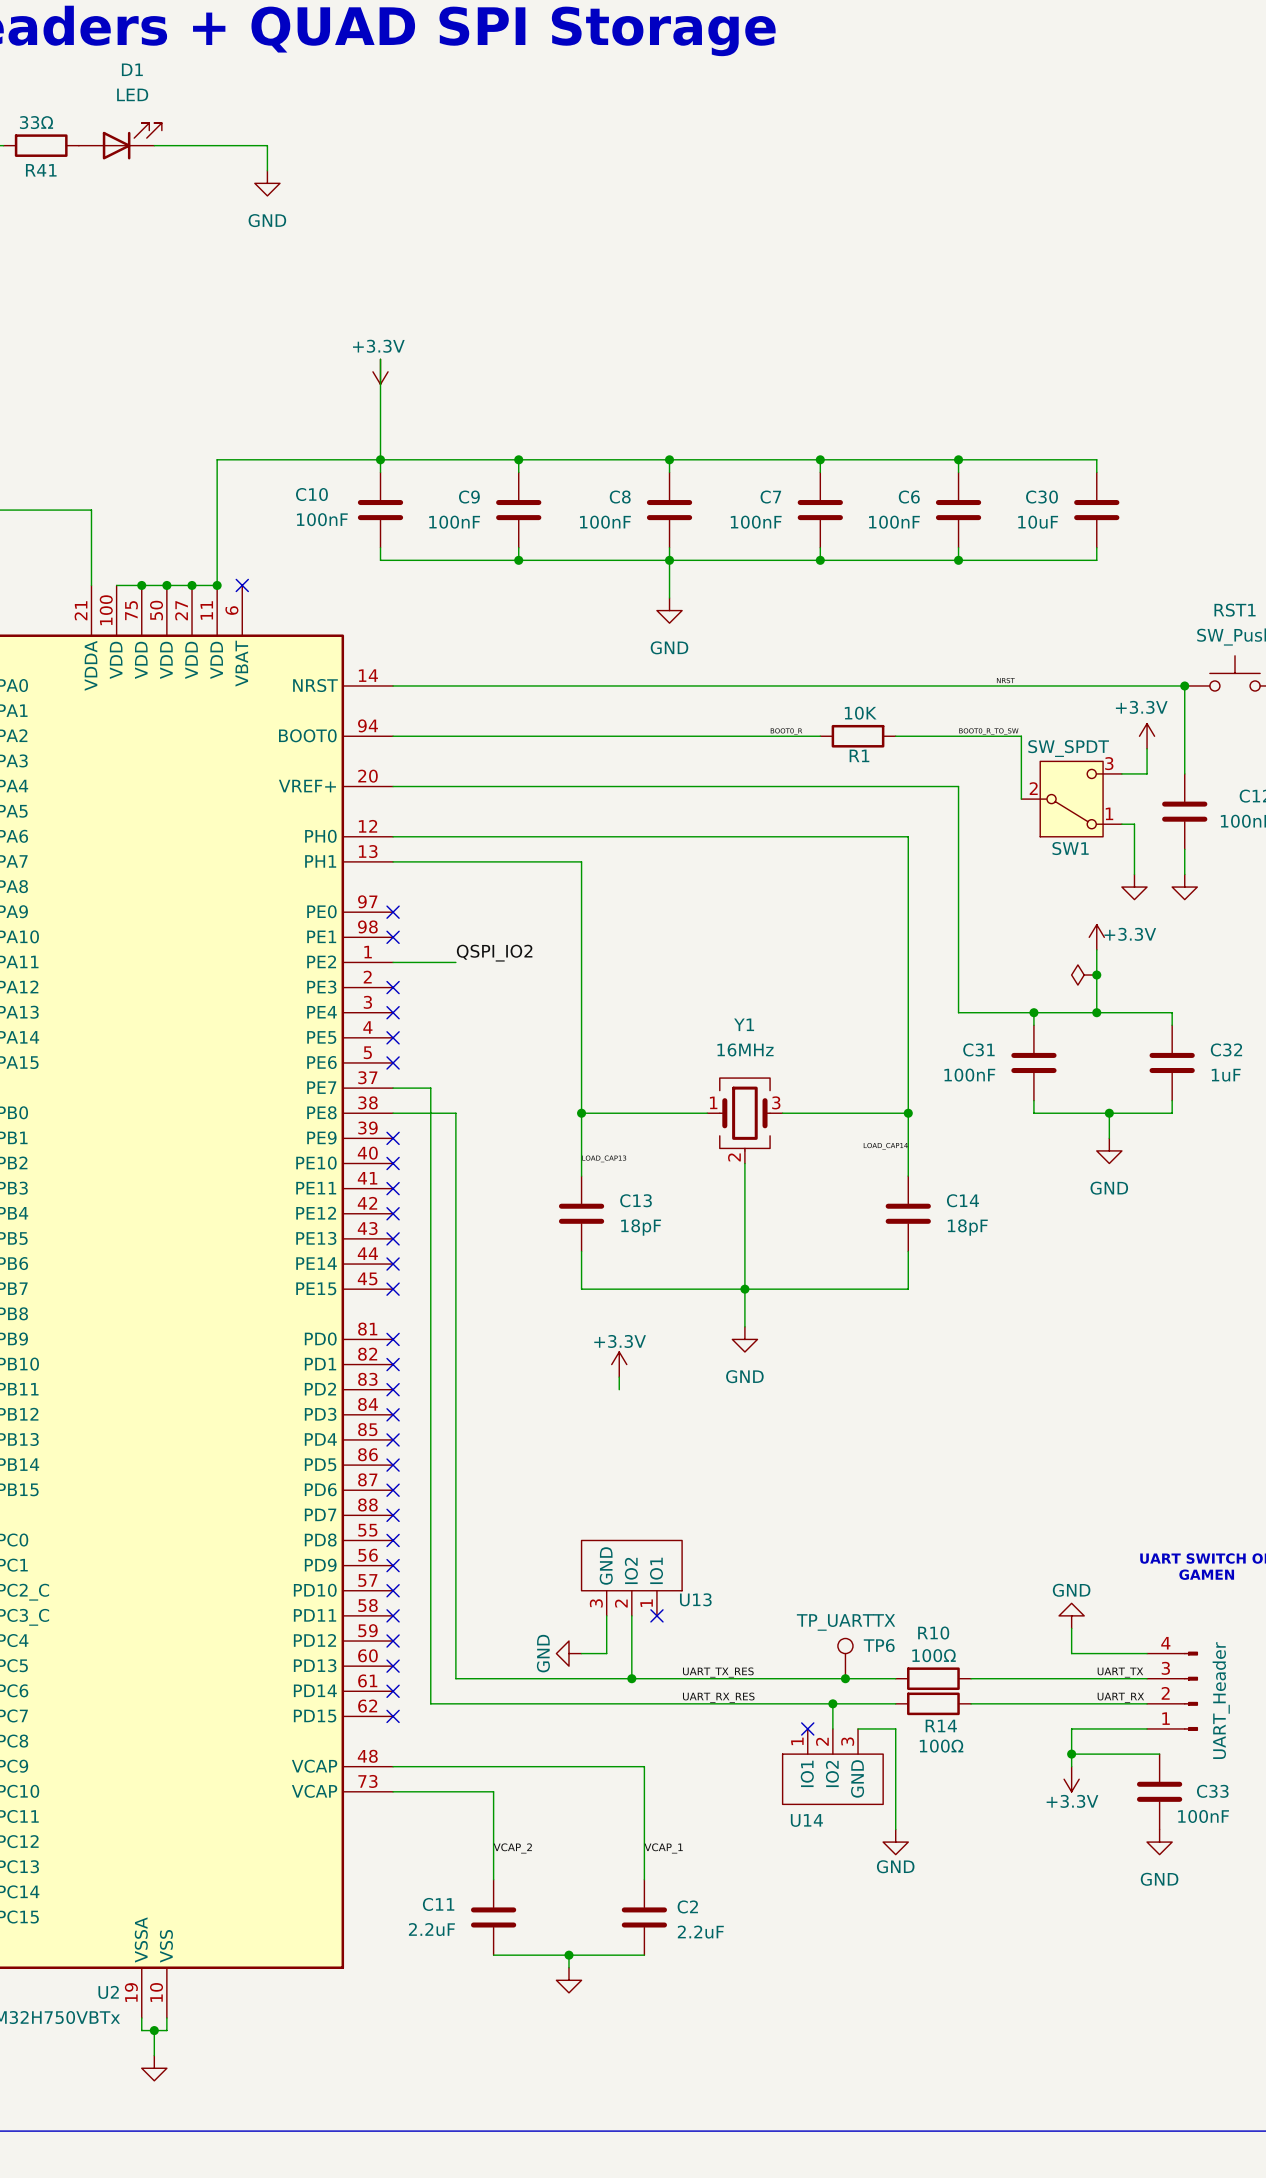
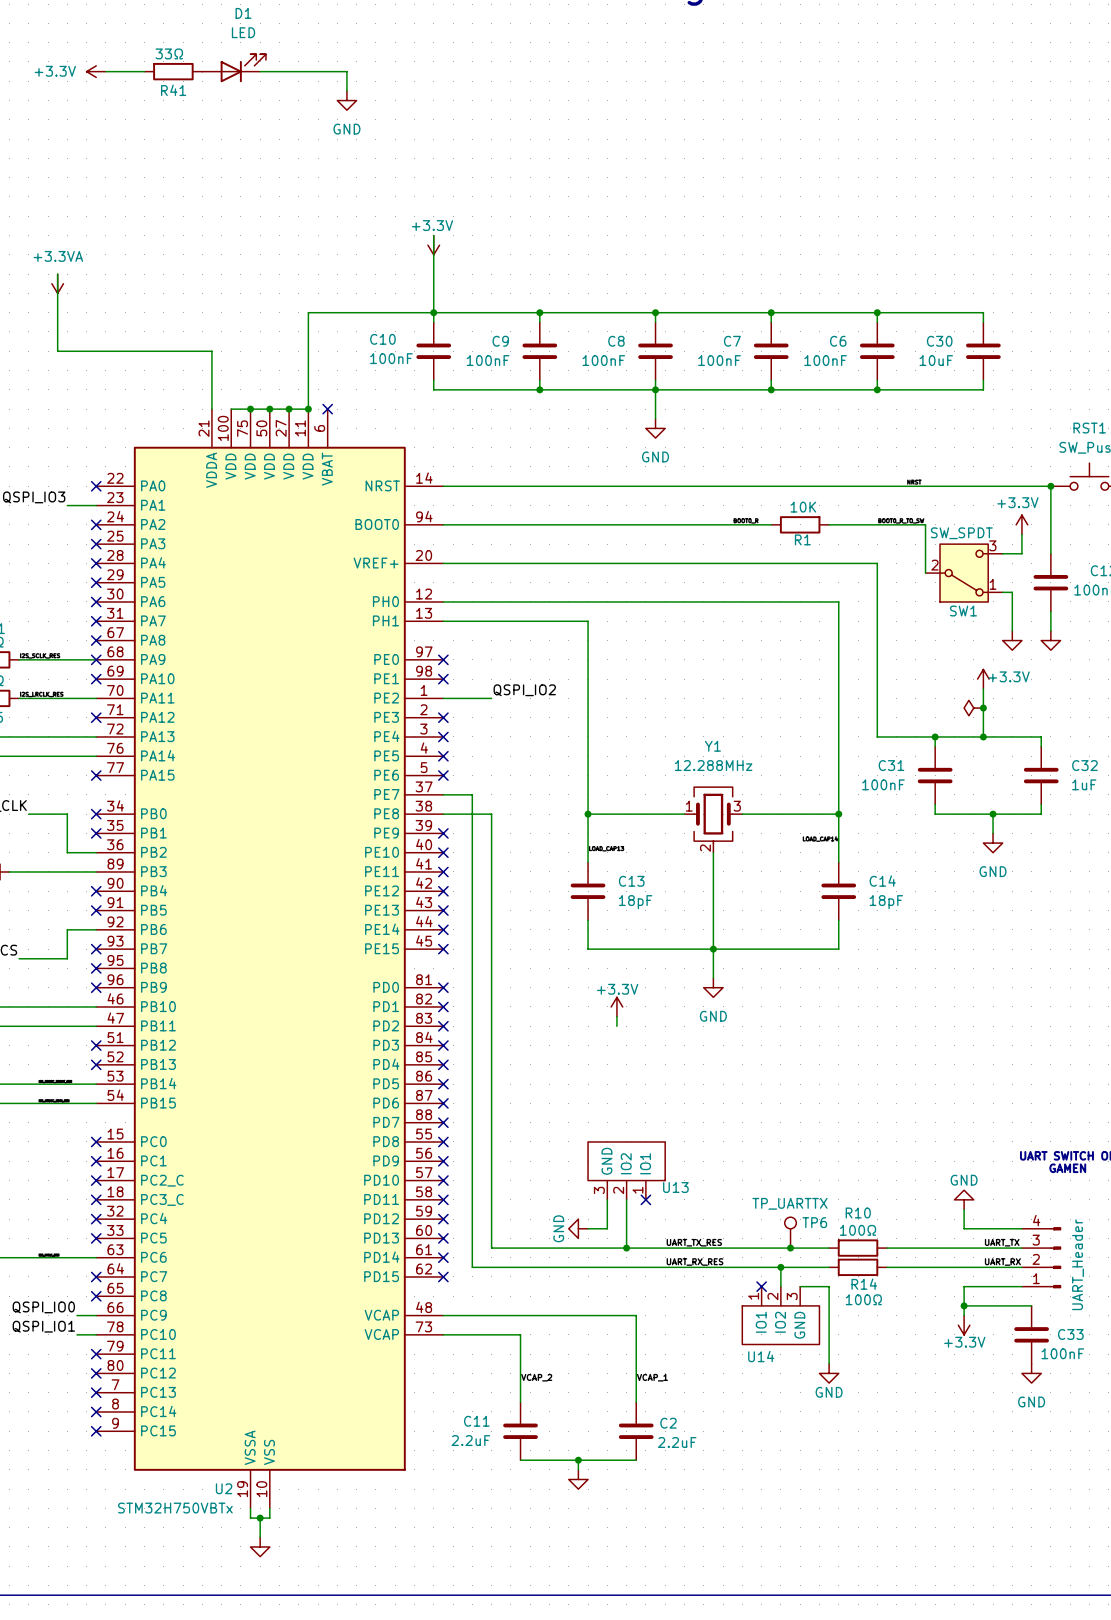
Y1 value: 16MHz (745, 1049) -> 12.288MHz (713, 765)

